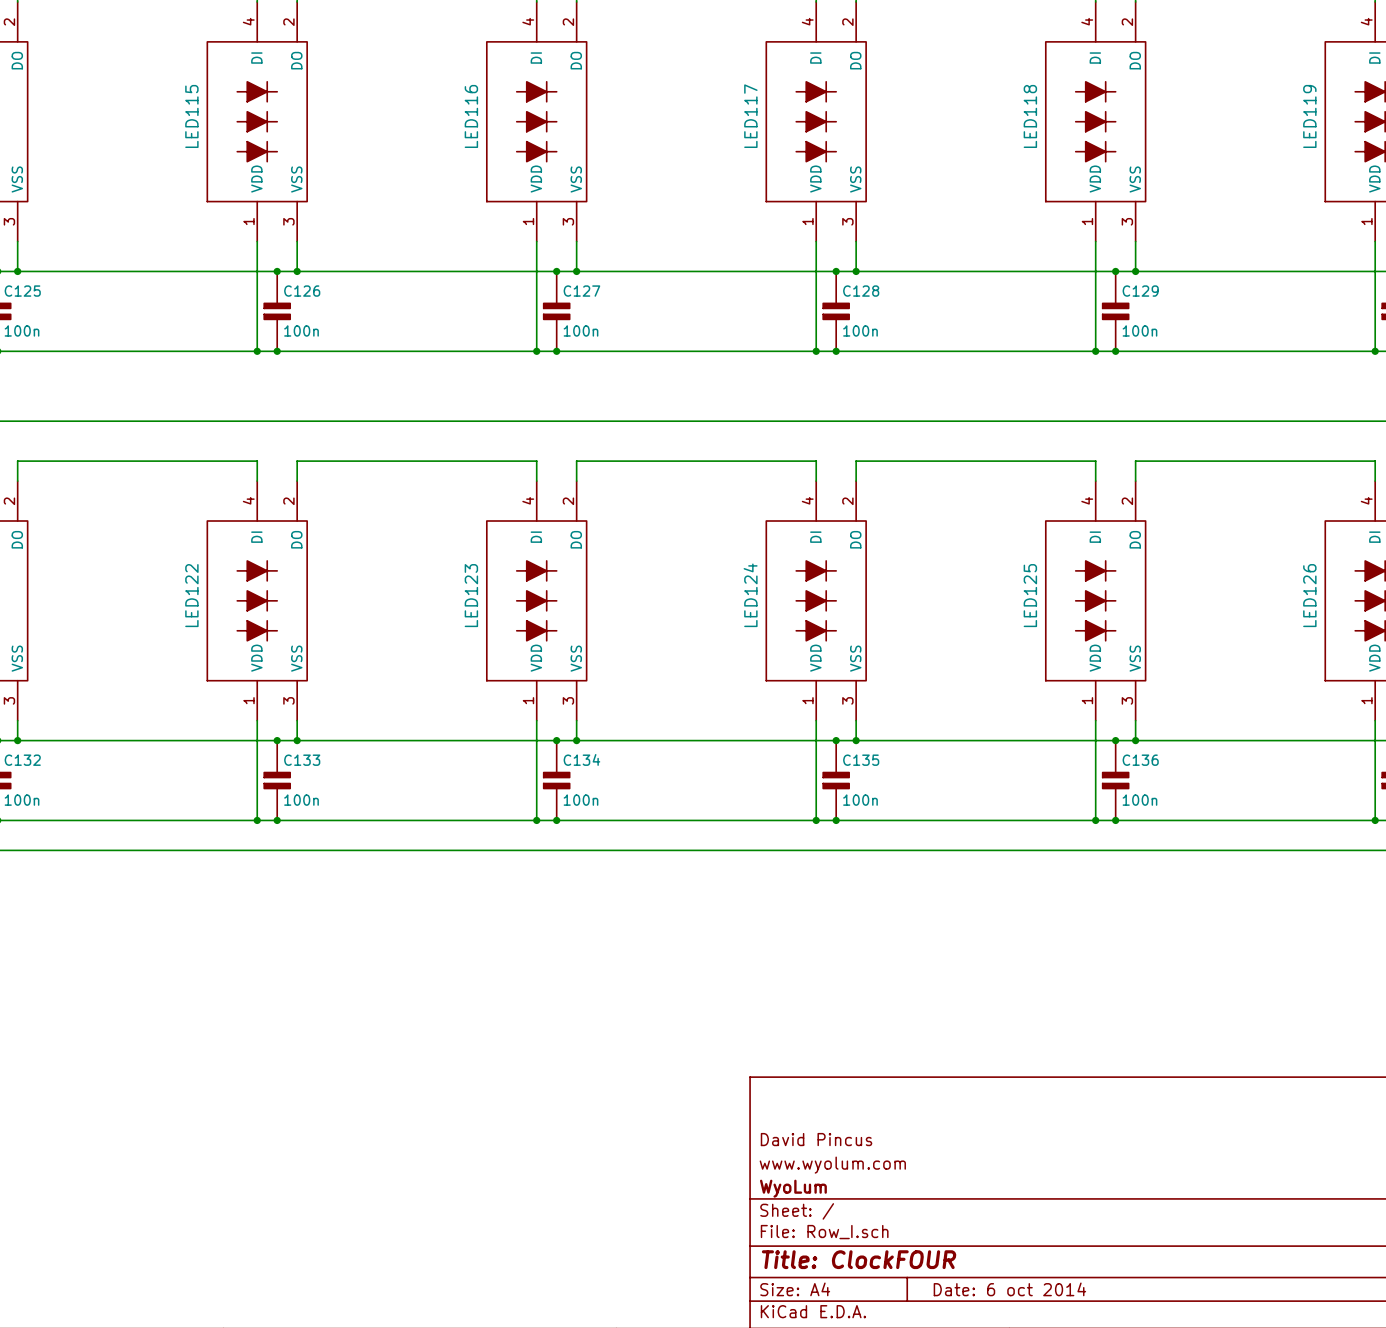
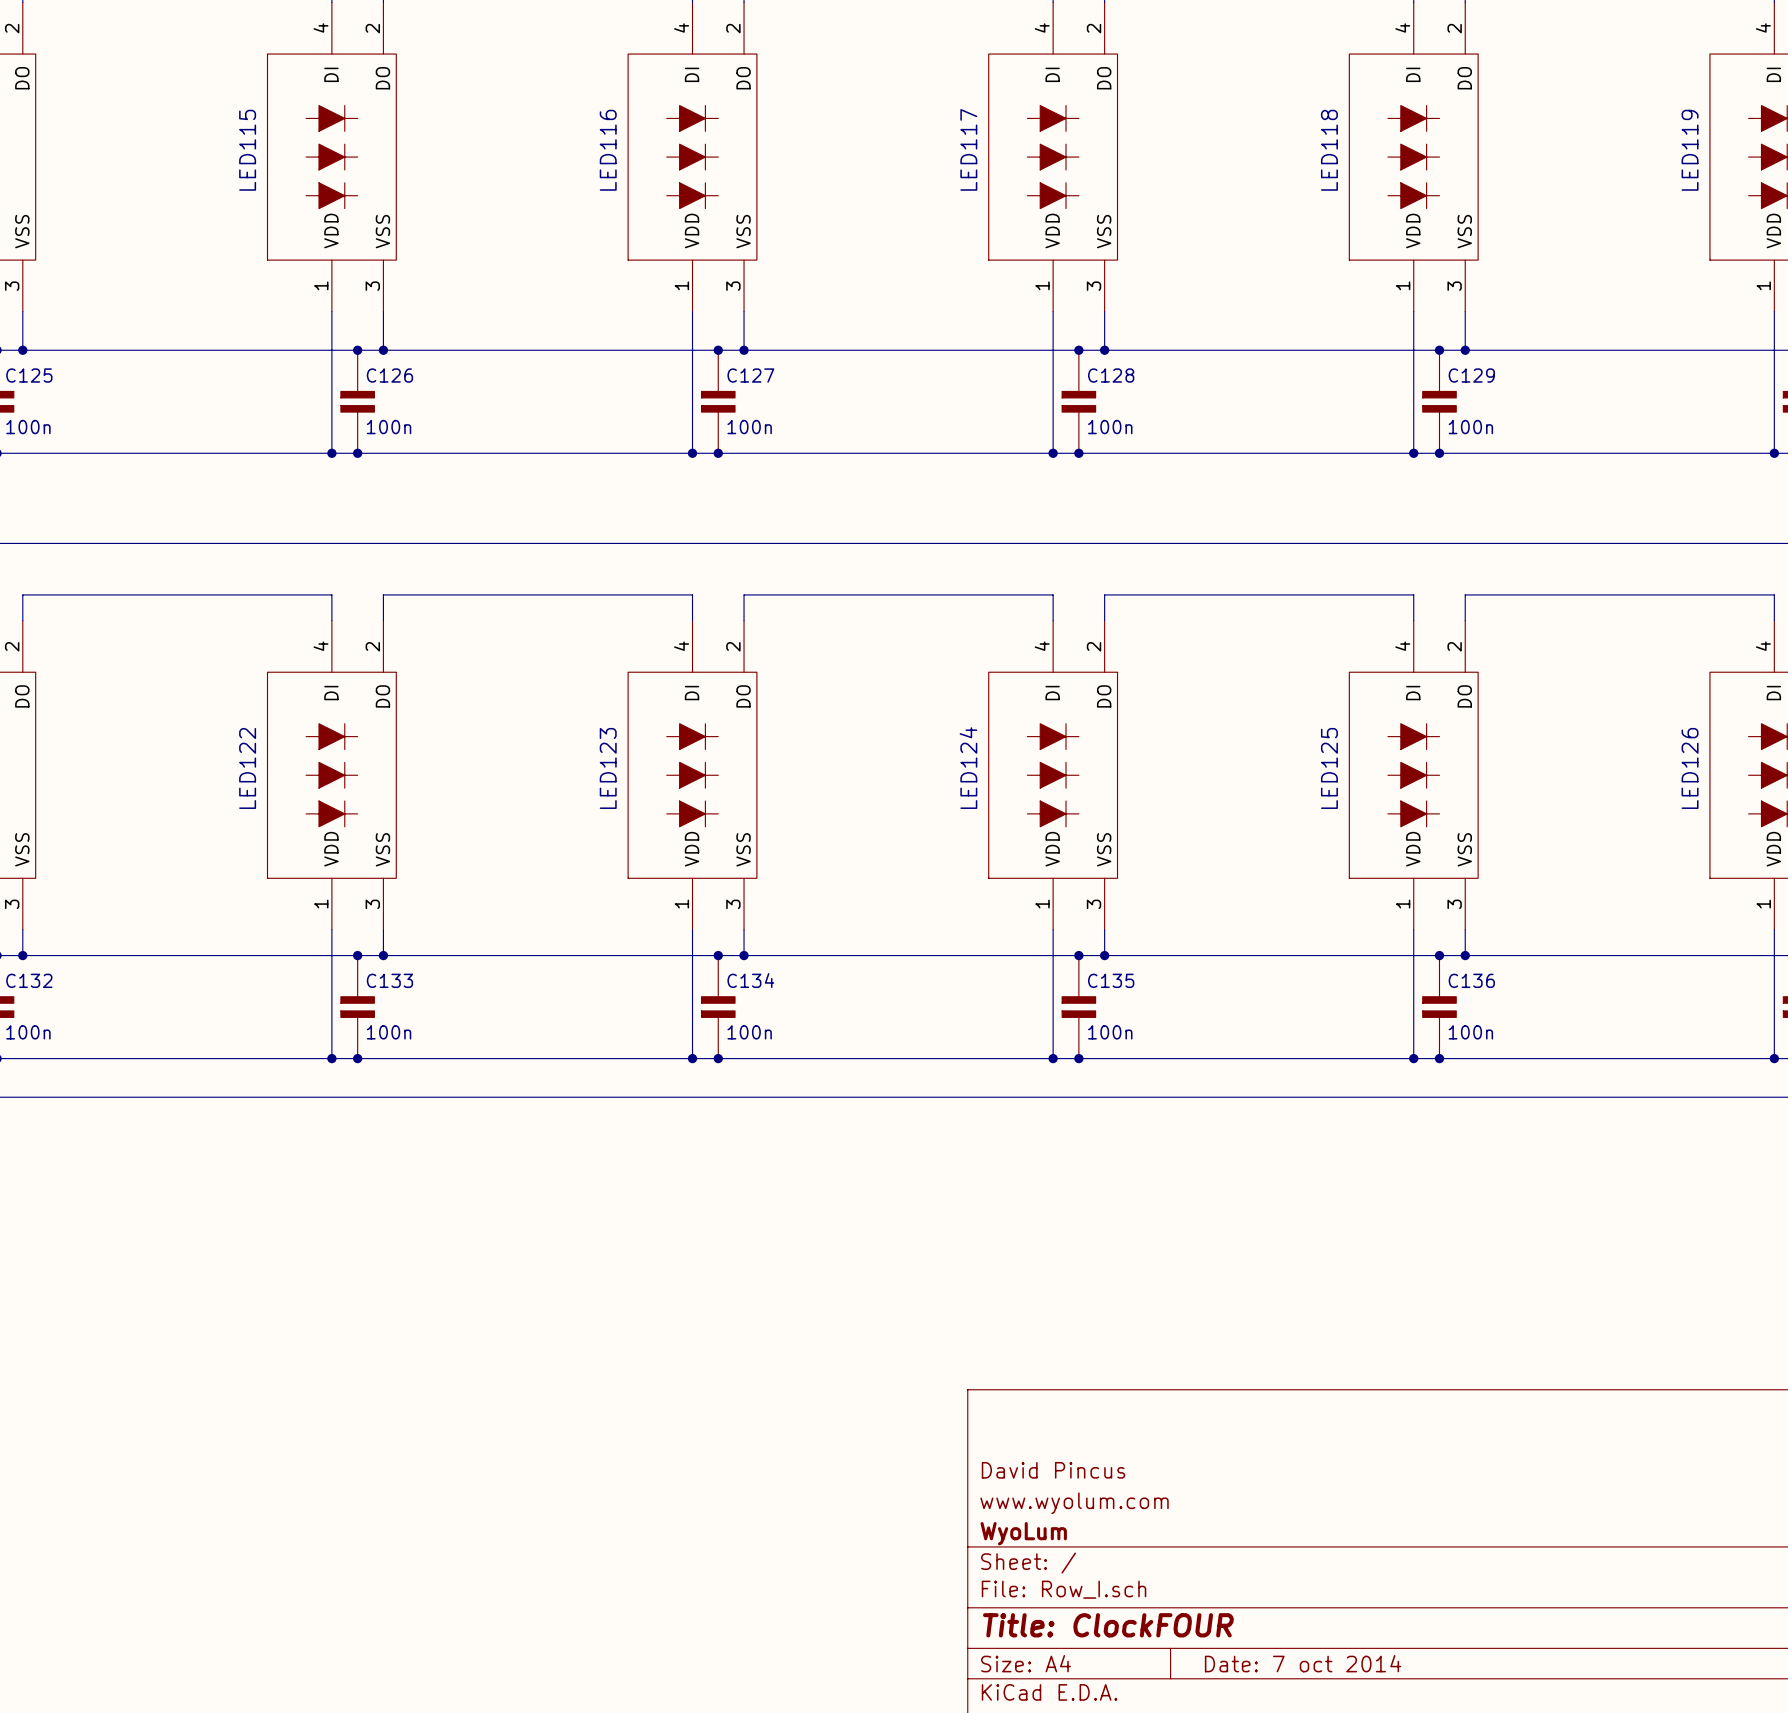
title block: Date: 6 oct 2014 (1009, 1289) -> Date: 7 oct 2014 (1303, 1663)

